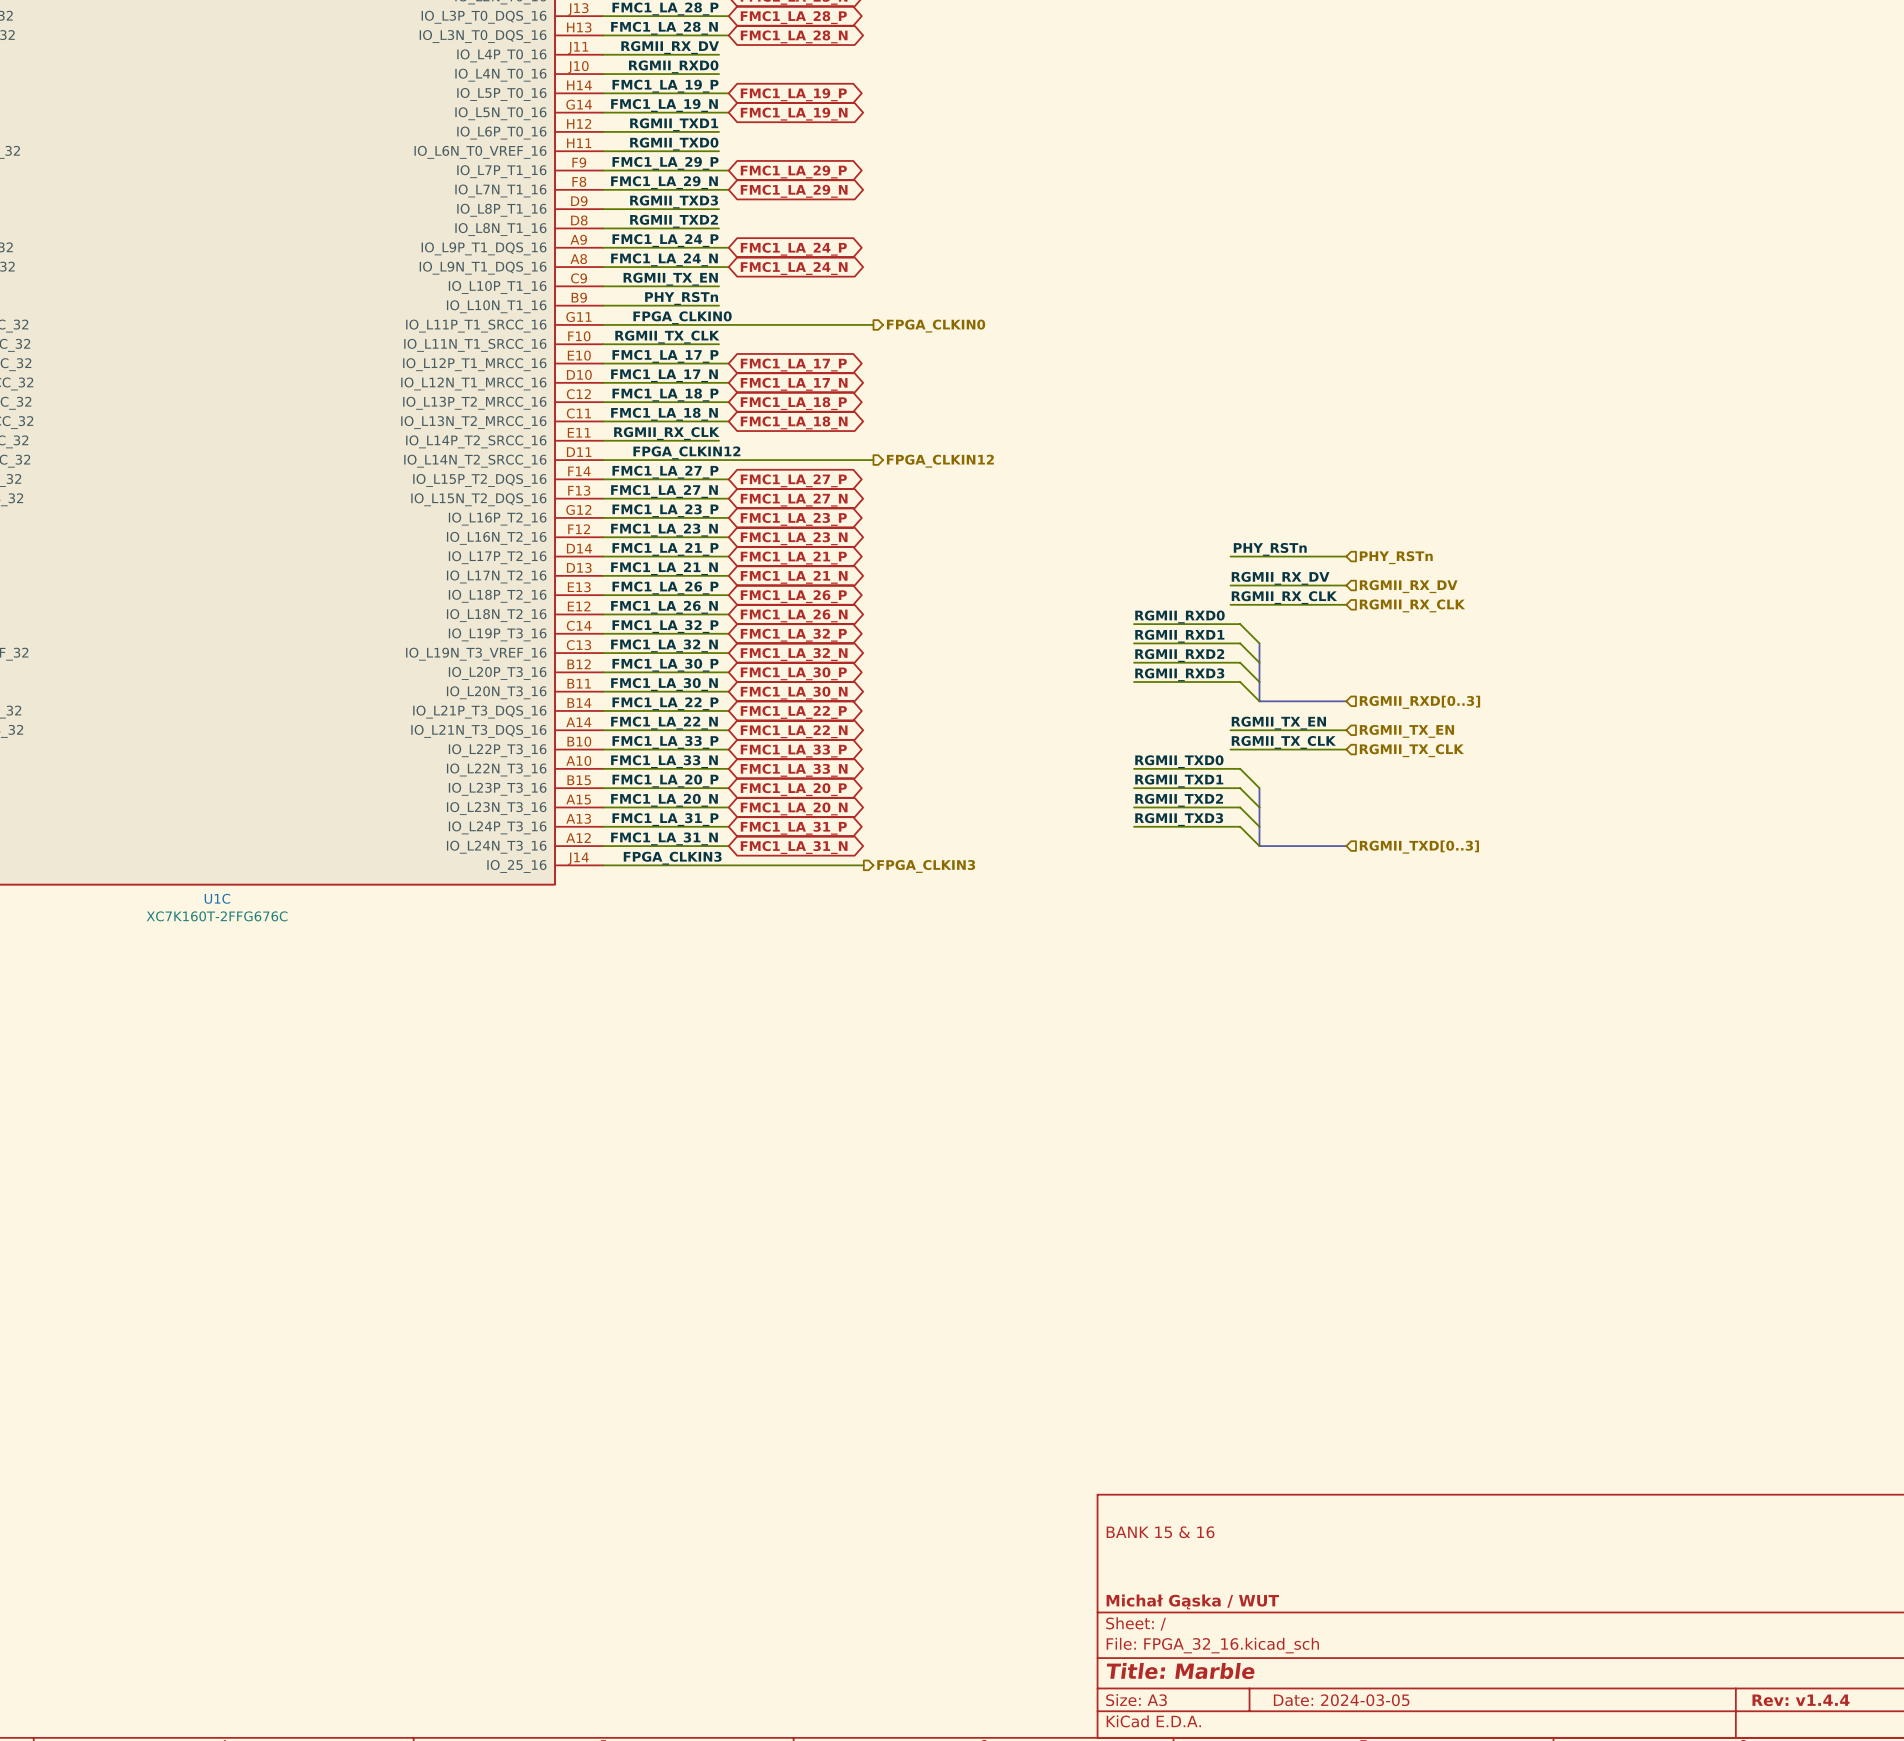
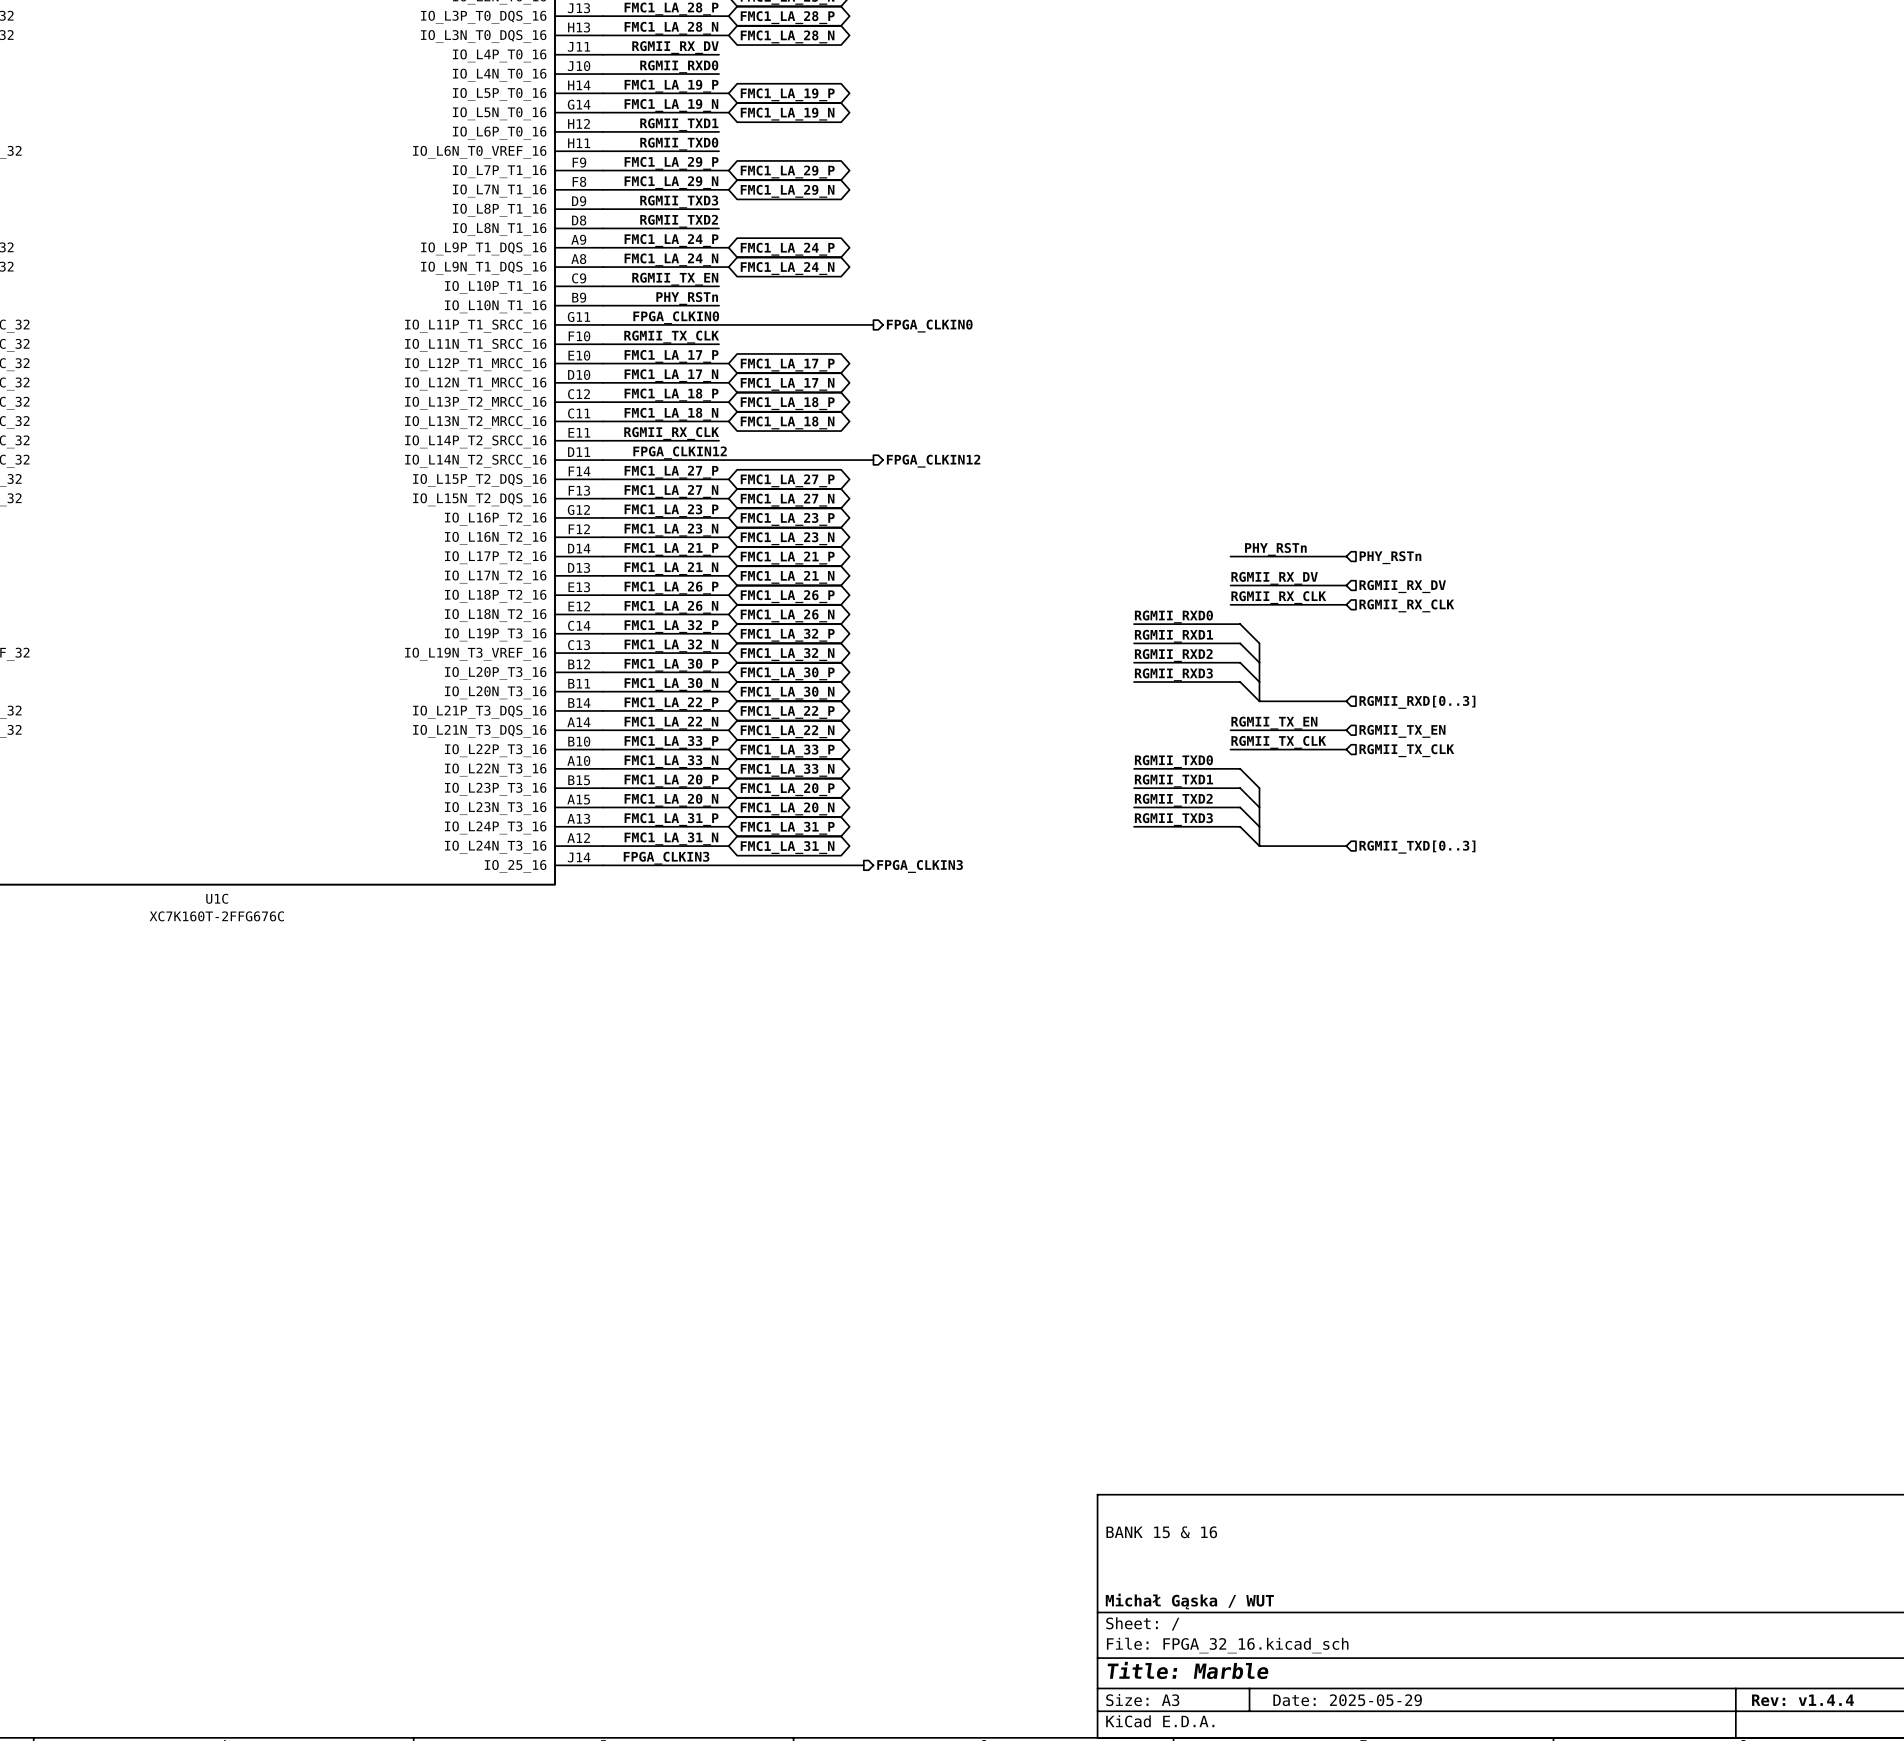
title block: Date: 2024-03-05 (1341, 1700) -> Date: 2025-05-29 (1347, 1700)

